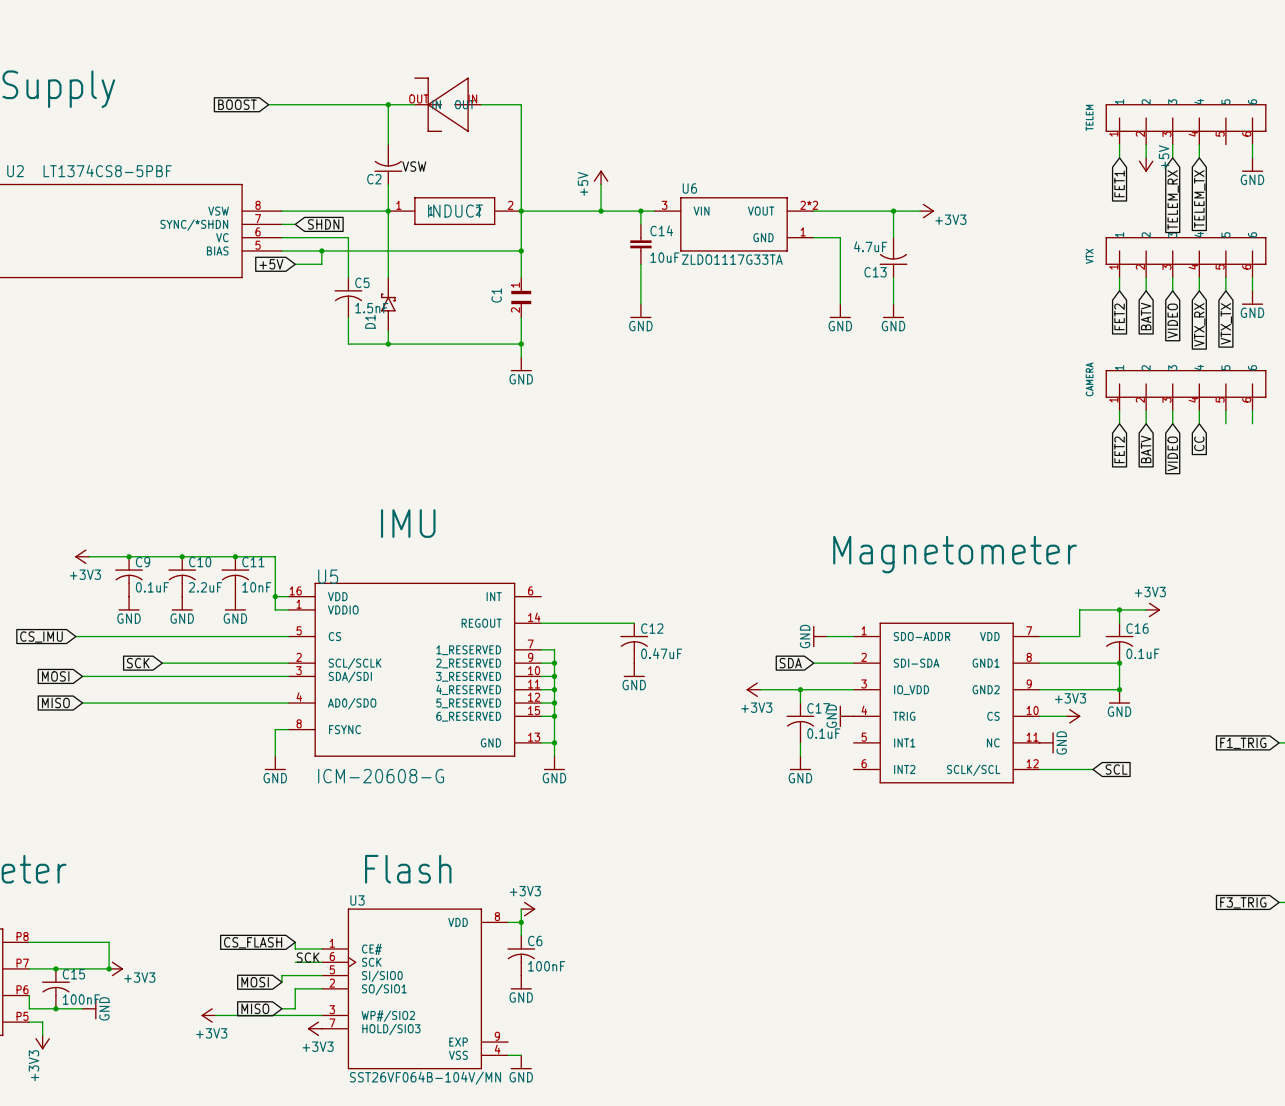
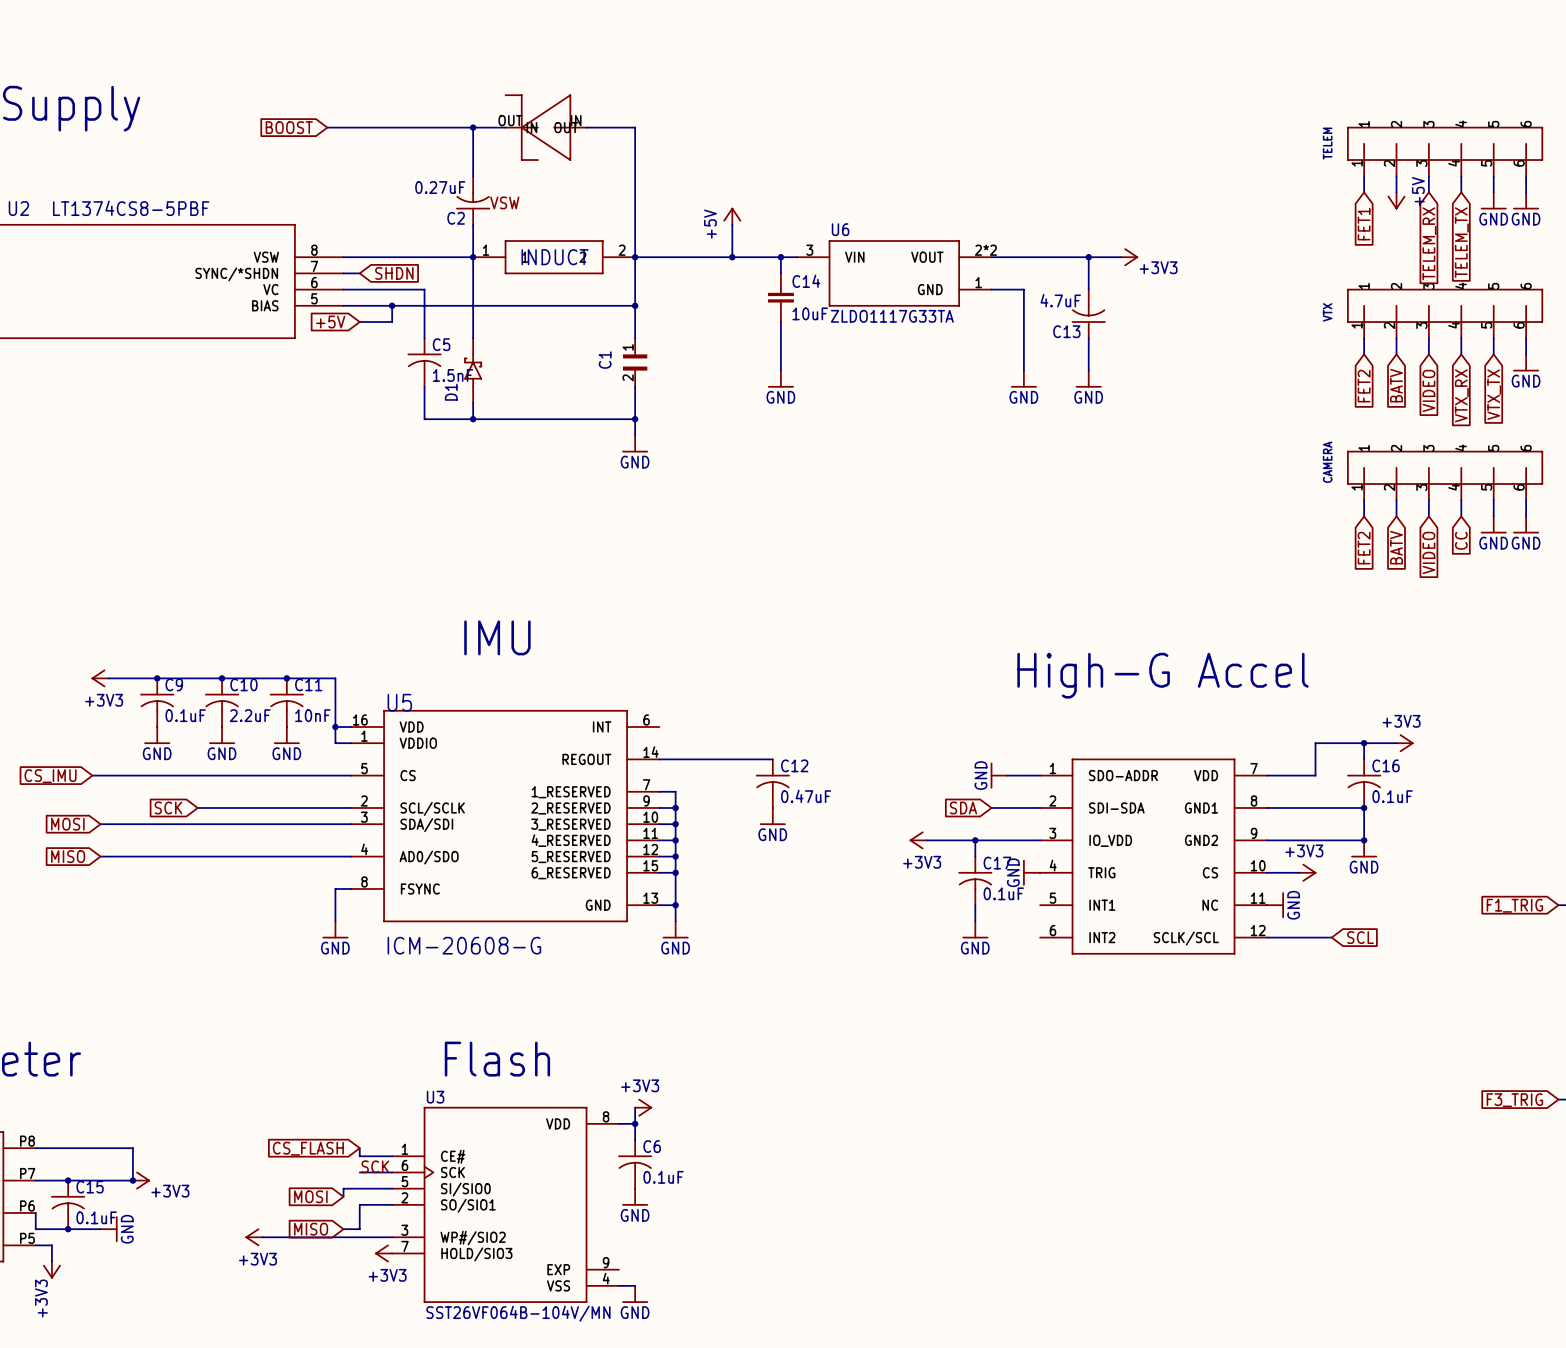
wire: none -> (1493, 176) (1493, 192)
C2 value: none -> 0.27uF (440, 187)
power symbol: none -> GND (1493, 200)
power symbol: none -> GND (1493, 524)
power symbol: none -> GND (1526, 524)
text: Magnetometer (955, 554) -> High-G Accel (1163, 675)
C6 value: 100nF (546, 966) -> 0.1uF (663, 1177)
C15 value: 100nF (81, 999) -> 0.1uF (96, 1217)

